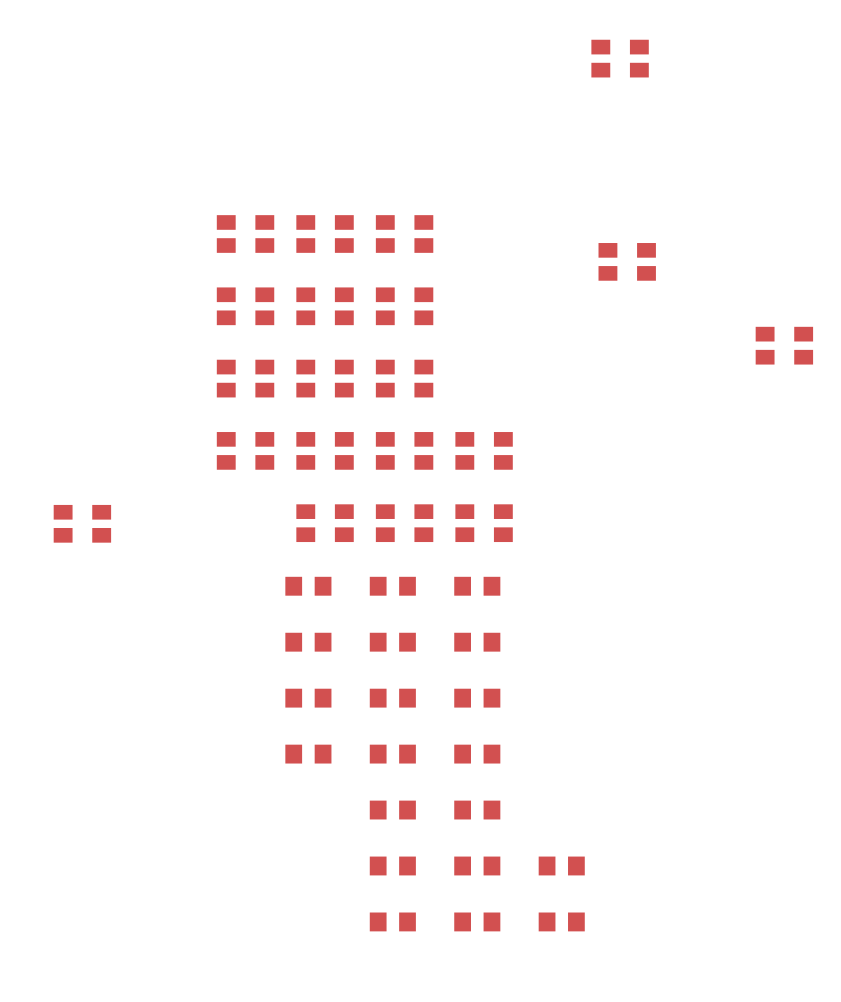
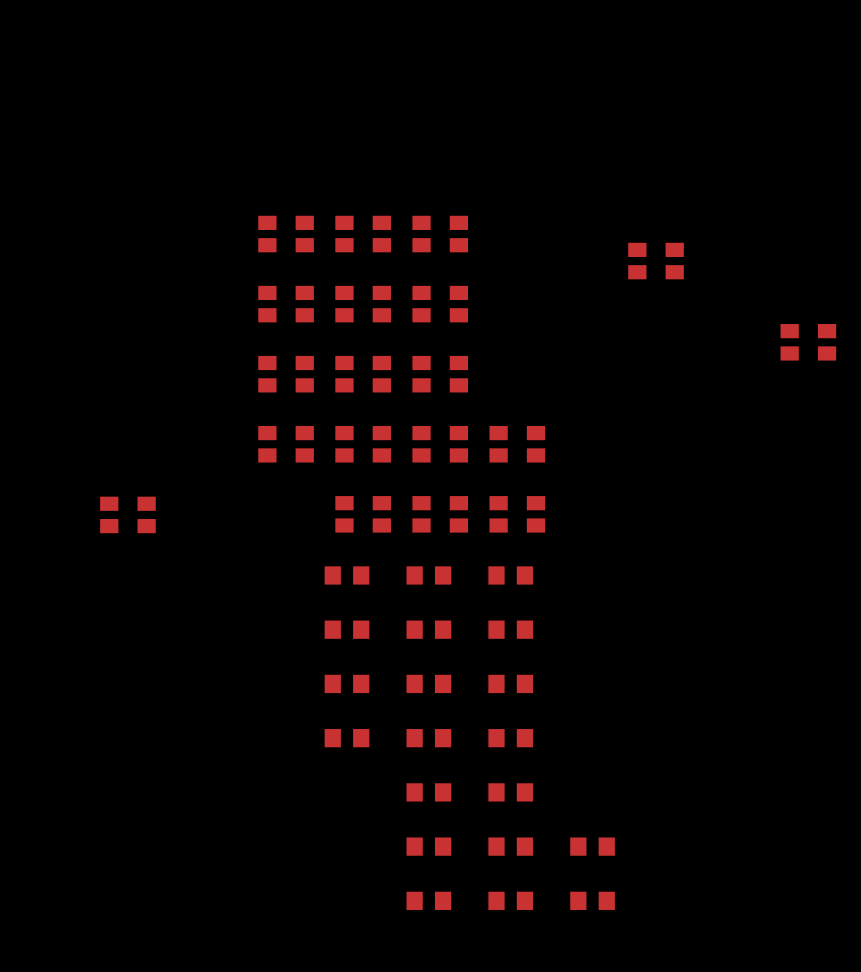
part: (620, 58) -> none

